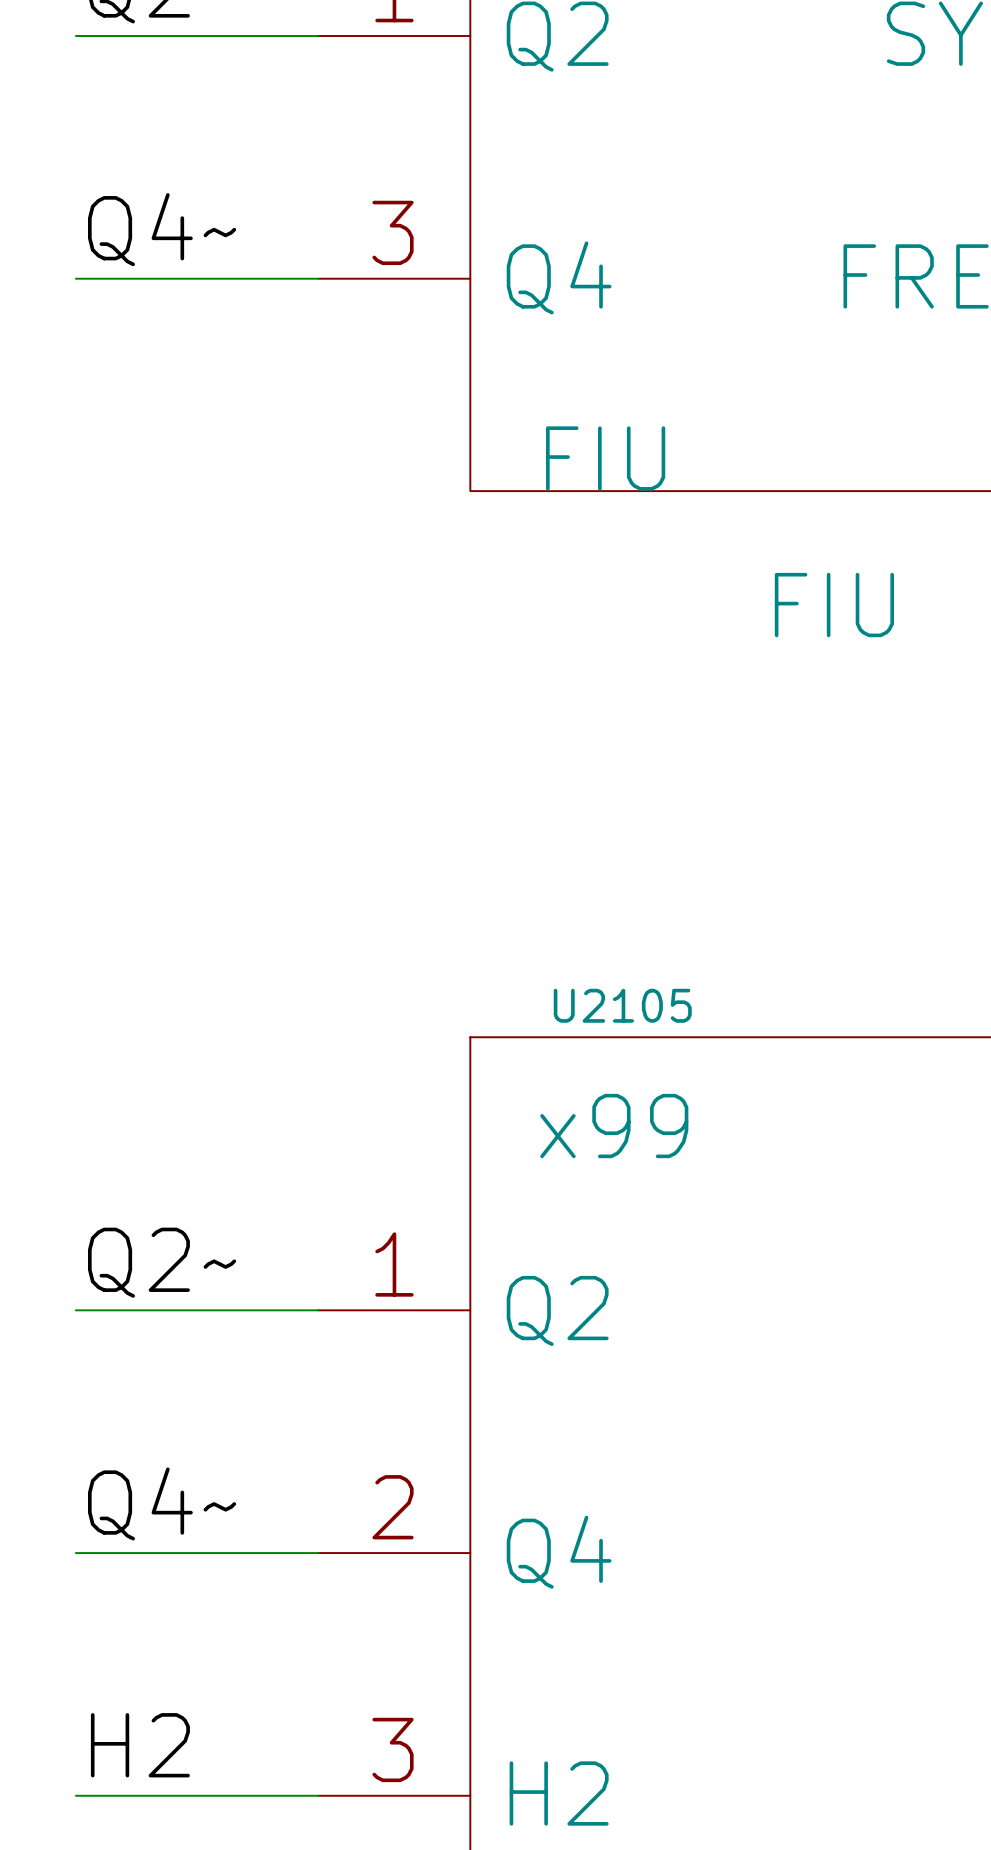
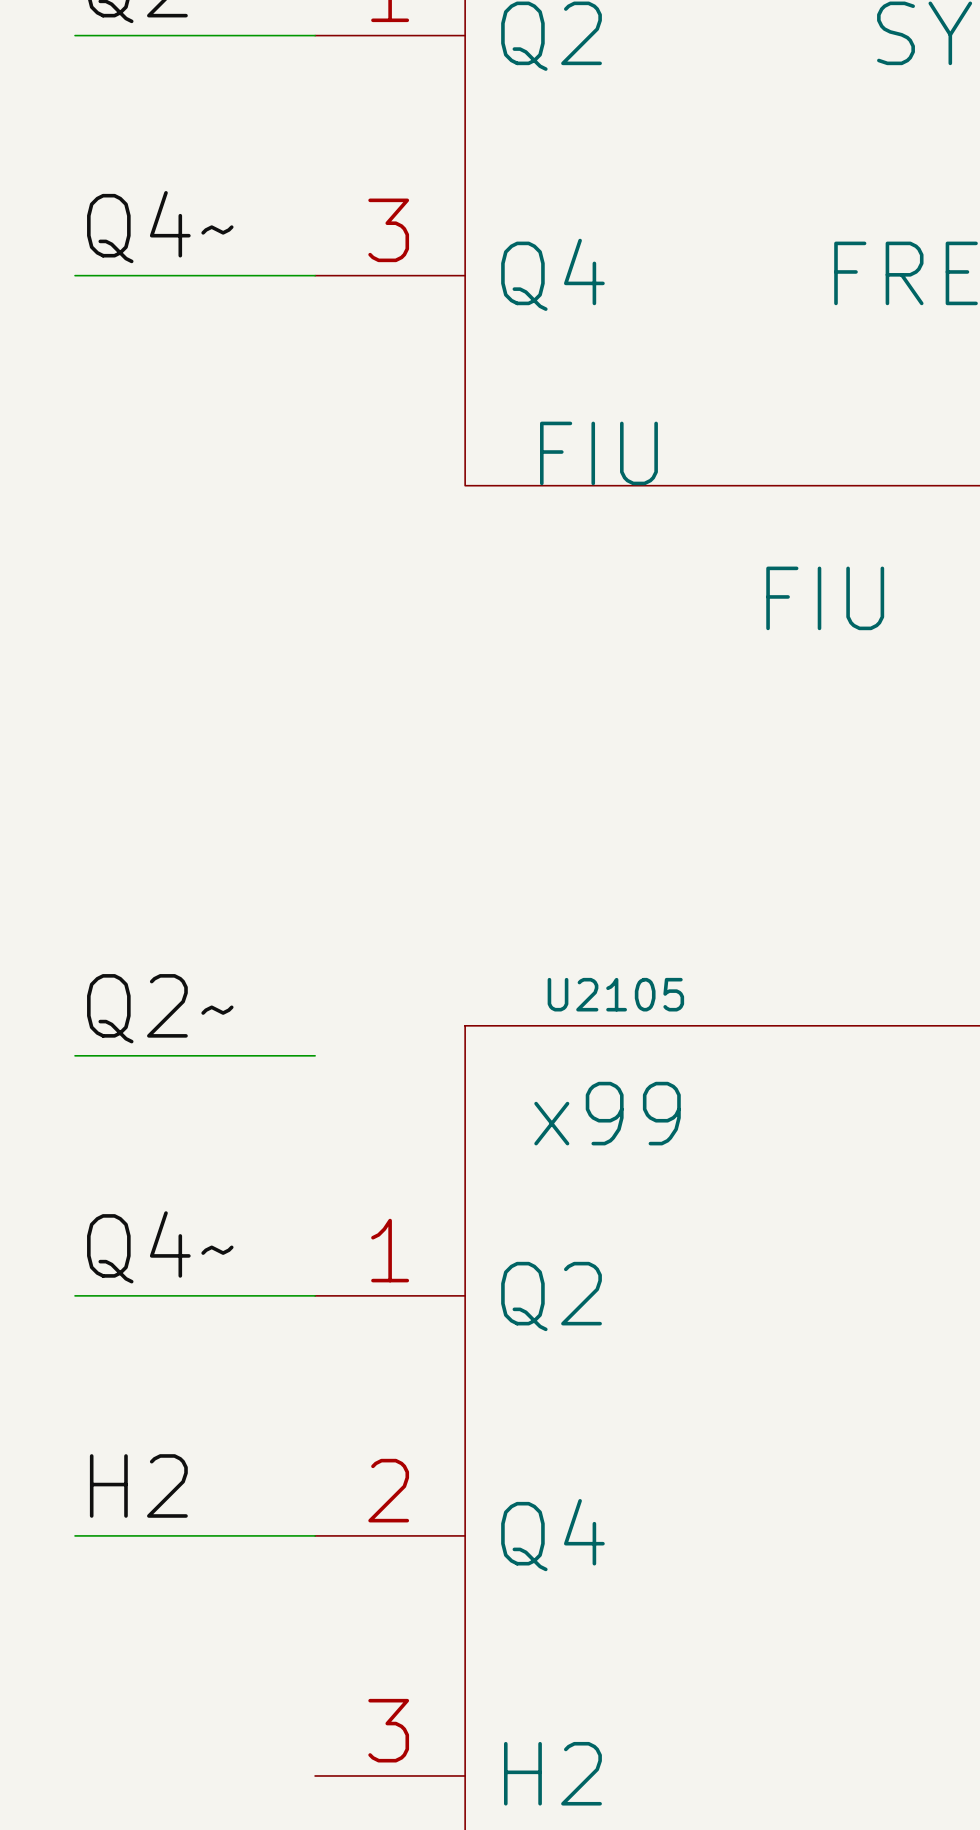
label: none -> Q2~ (160, 1008)
wire: none -> (75, 1055) (315, 1055)
label: Q2~ (162, 1262) -> Q4~ (160, 1247)
label: Q4~ (162, 1503) -> H2 (138, 1485)
label: H2 (140, 1745) -> none
wire: (75, 1795) (318, 1795) -> none

